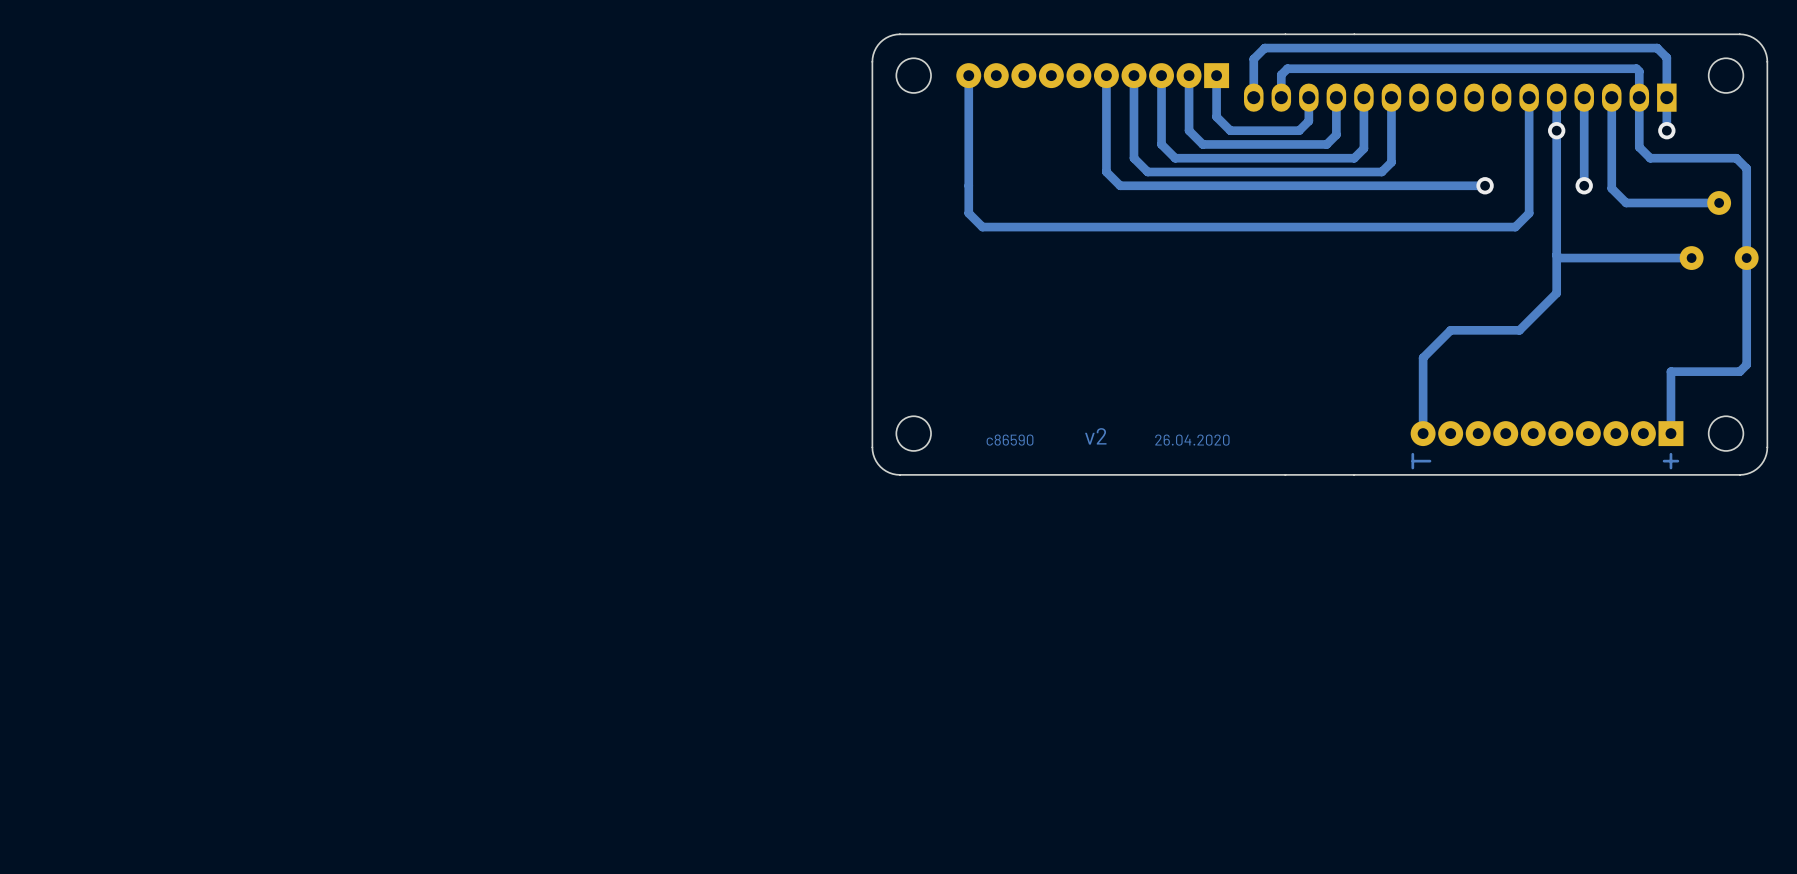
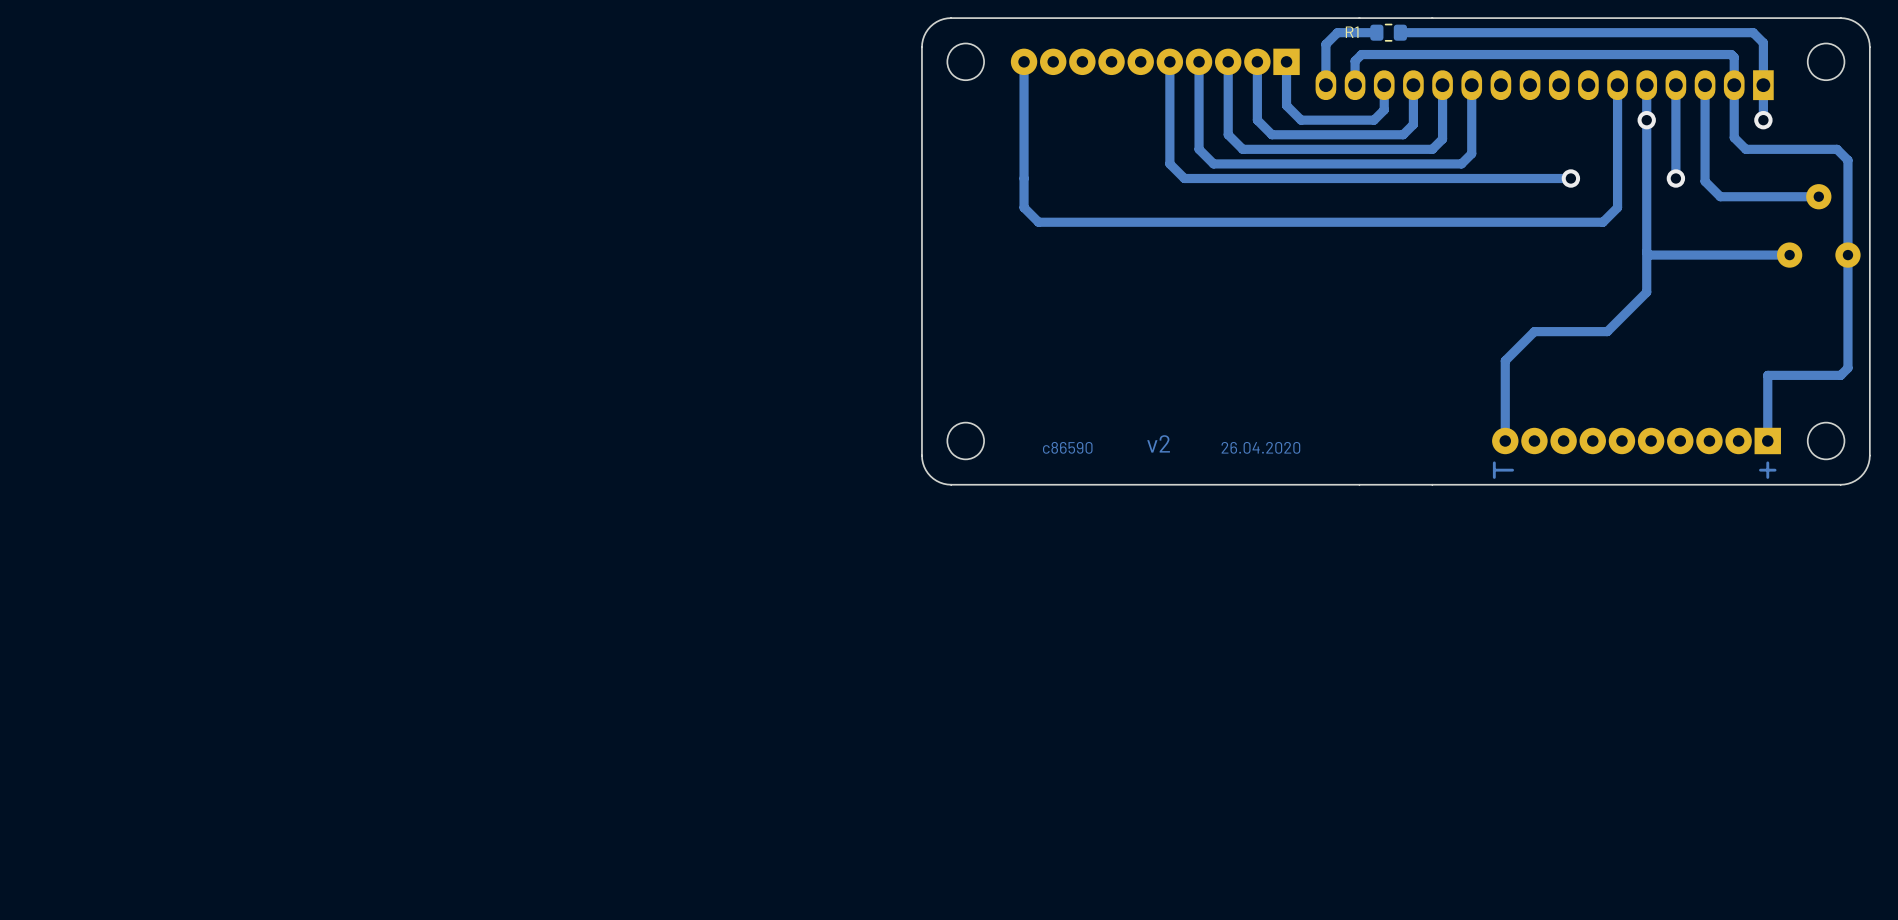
R1: none -> (1388, 32)
track: (1324, 48) (1301, 48) -> none

